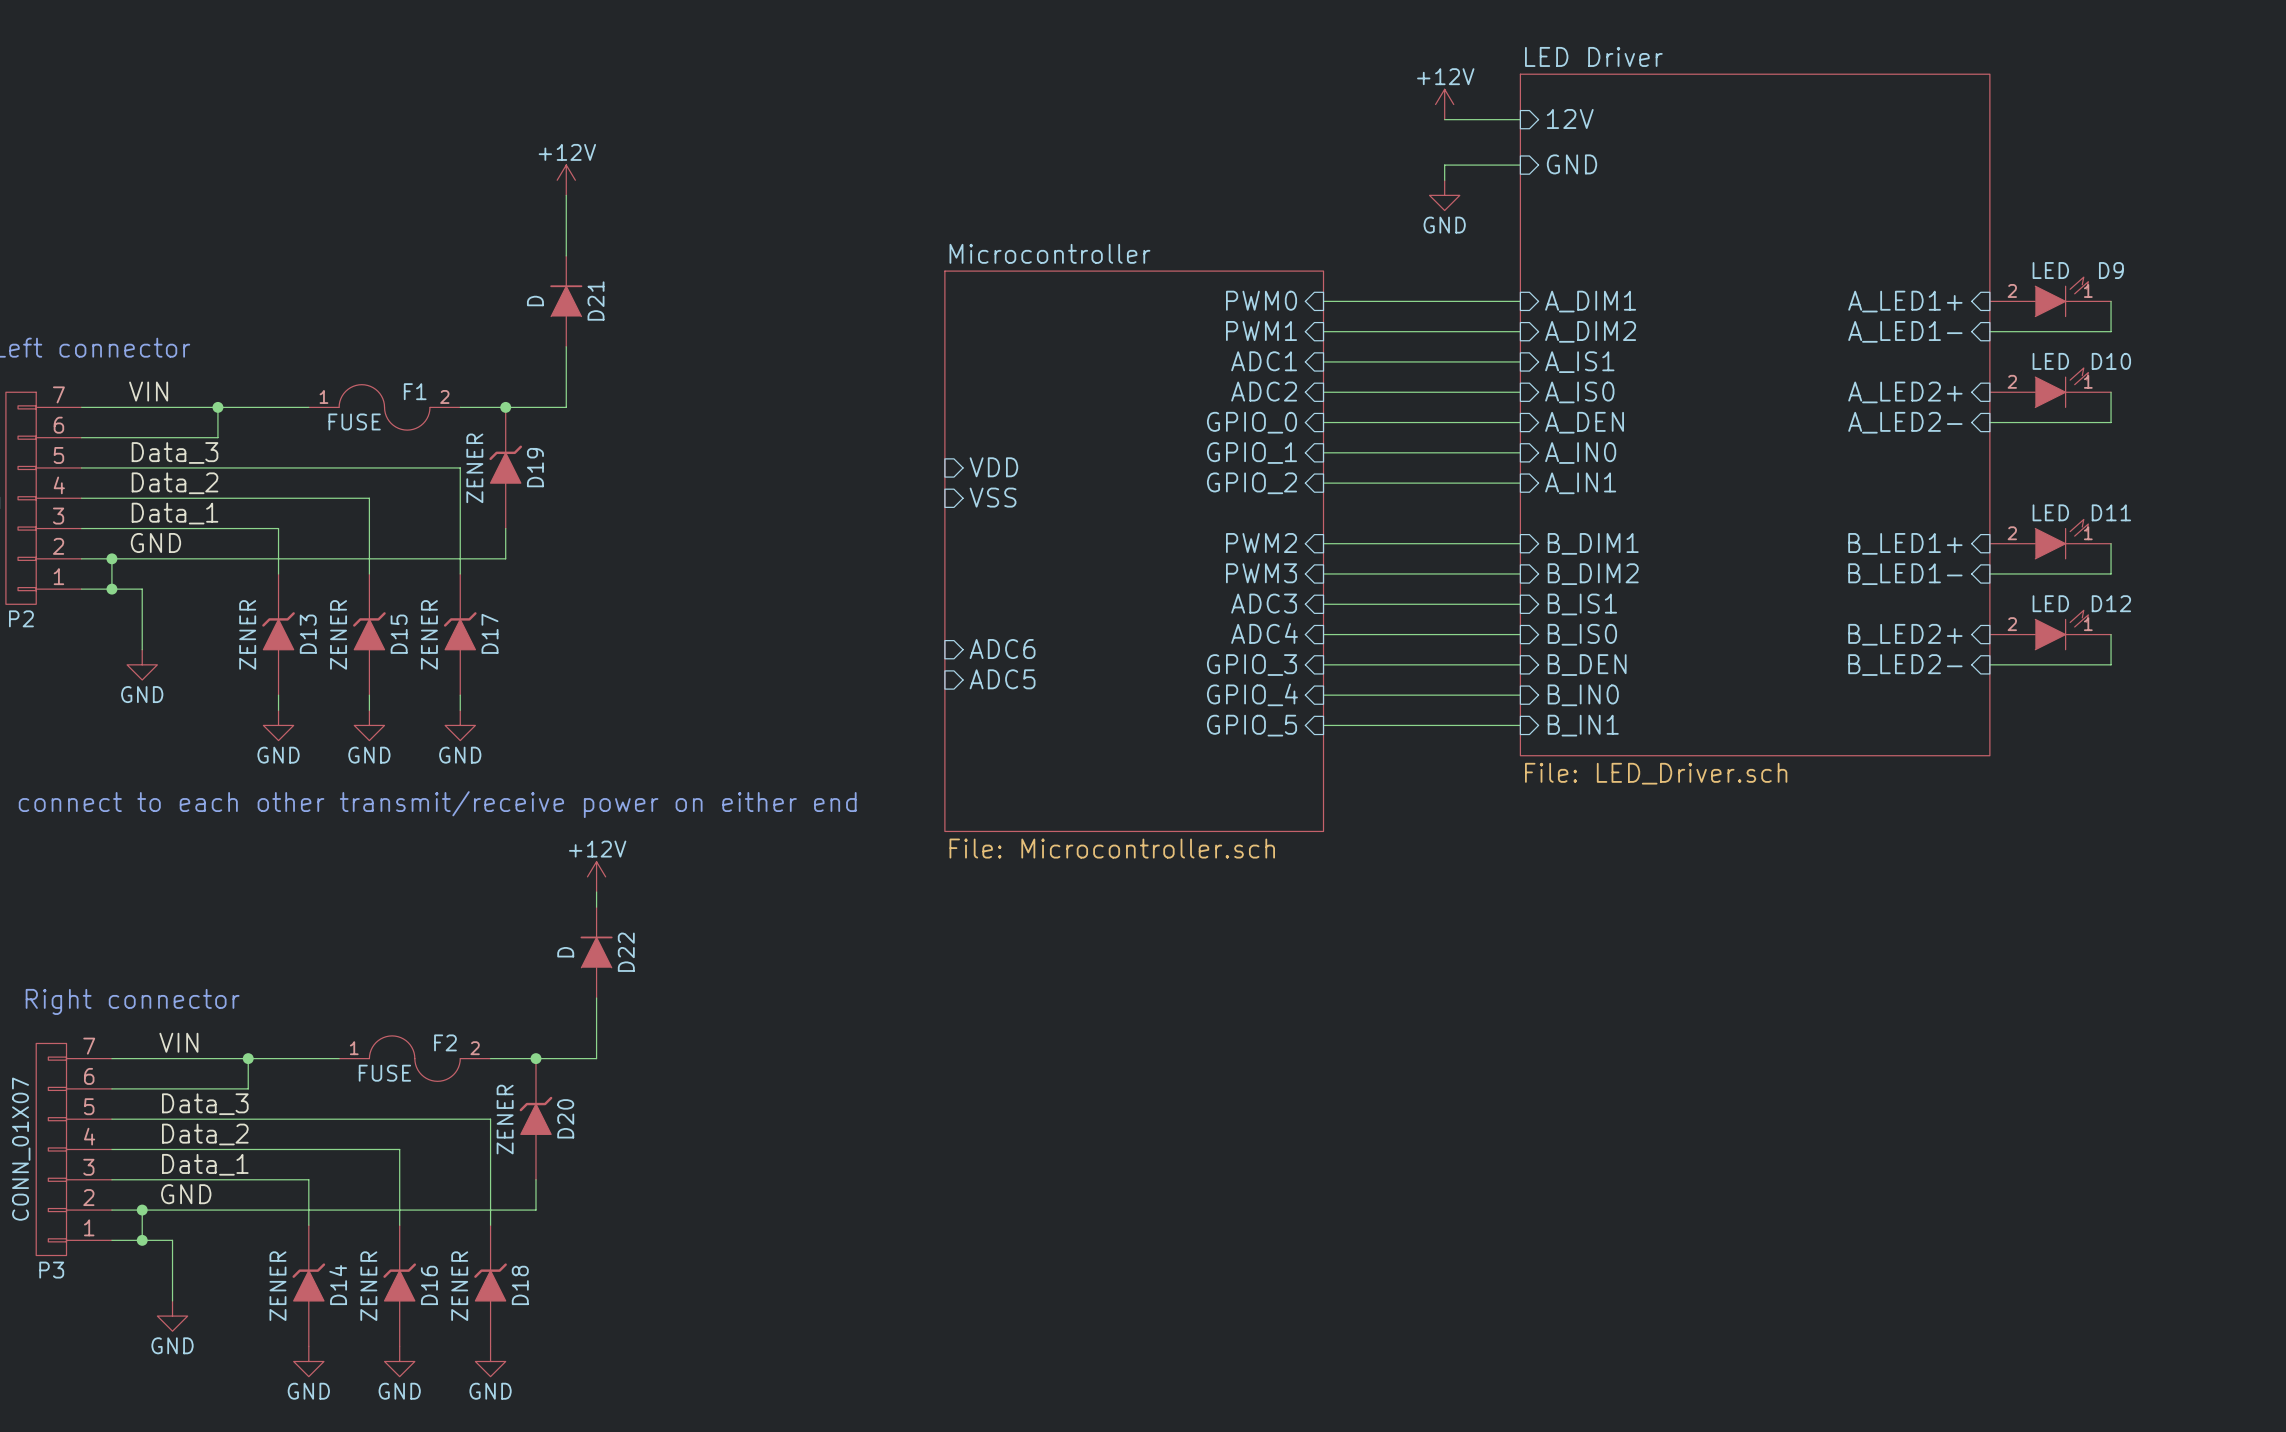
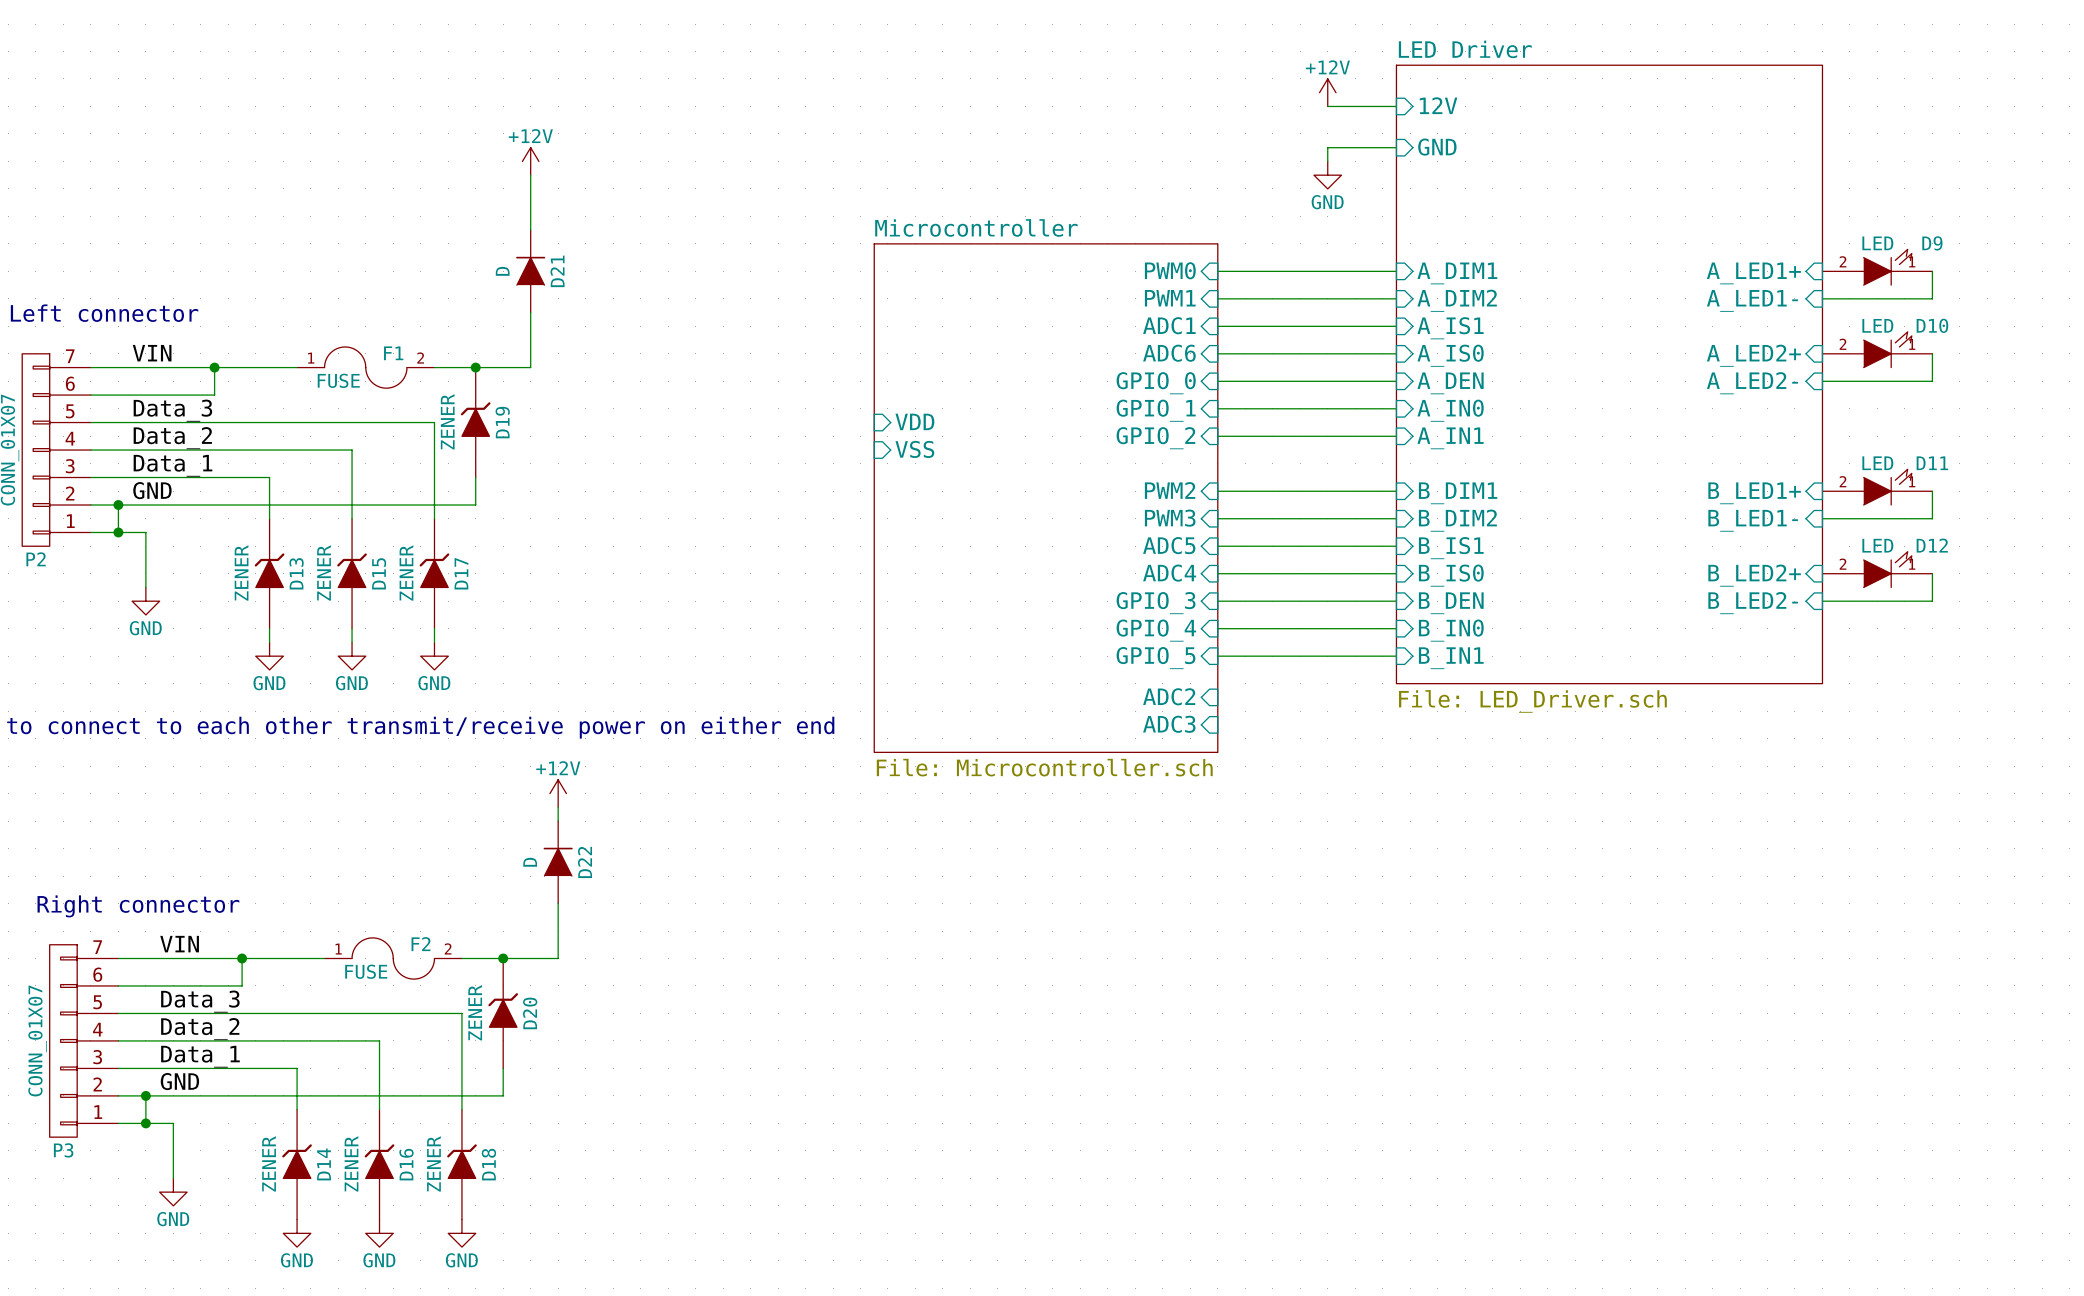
sheet pin: ADC2 (1264, 391) -> ADC6 (1169, 353)
sheet pin: ADC3 (1264, 603) -> ADC5 (1169, 545)
sheet pin: ADC6 (1002, 649) -> none
sheet pin: ADC5 (1002, 679) -> none
sheet pin: none -> ADC2 (1169, 696)
sheet pin: none -> ADC3 (1169, 724)

